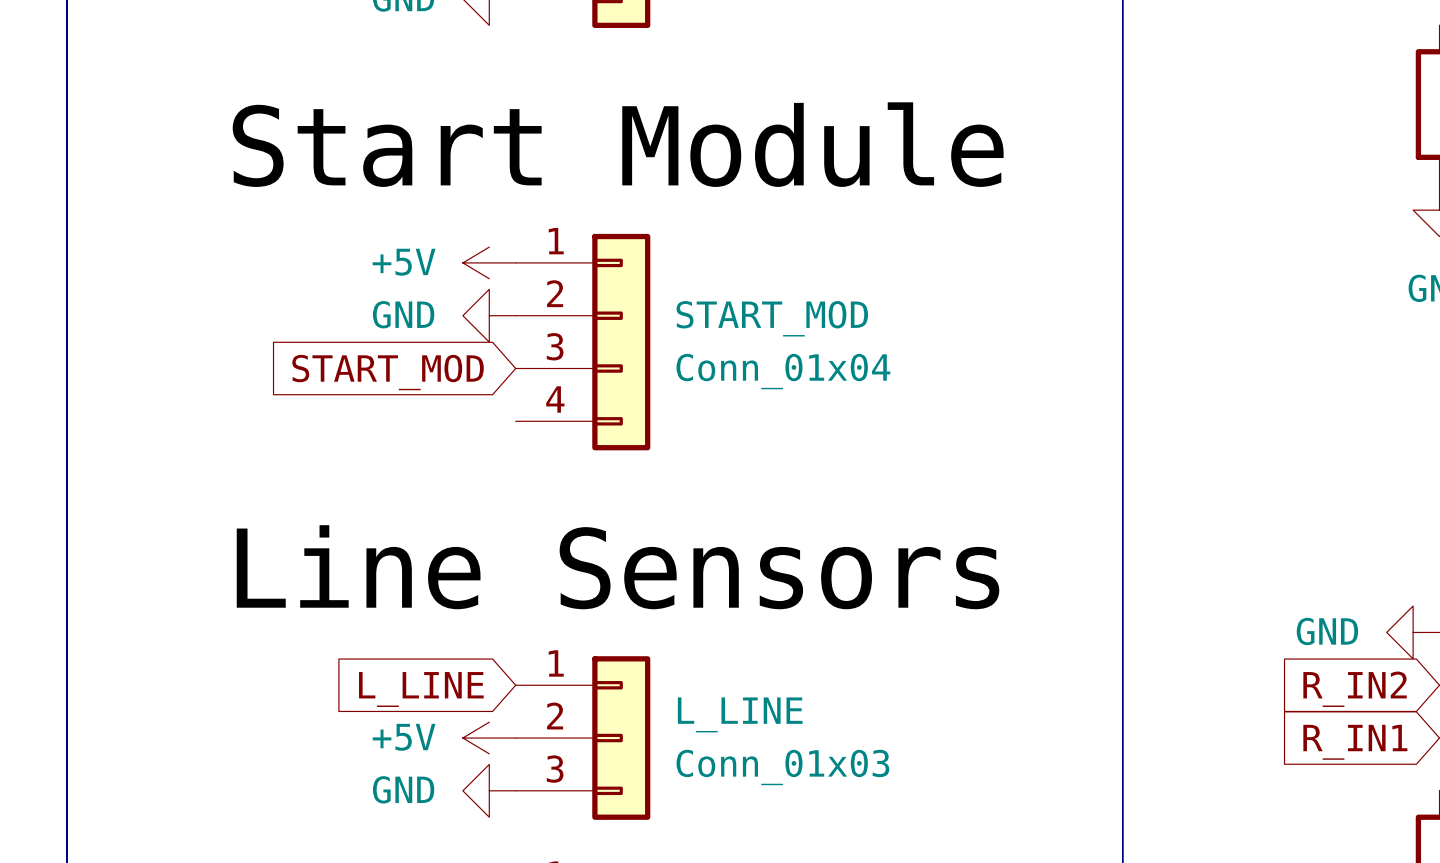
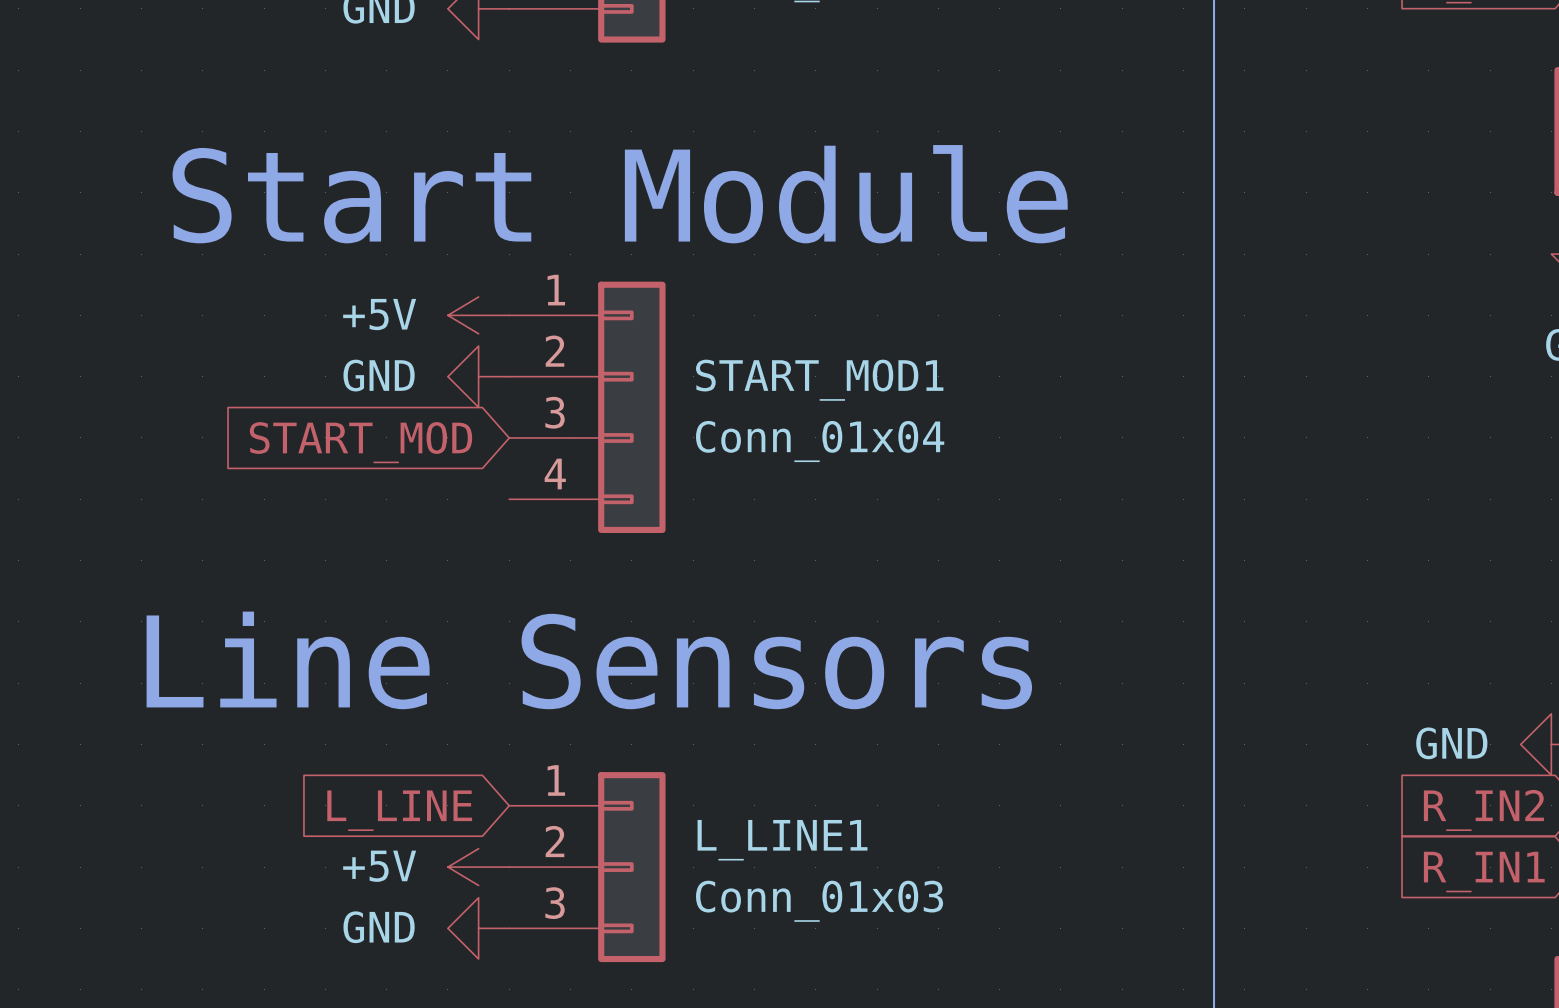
label: Start Module (618, 144) -> none
text: none -> Start Module (620, 194)
START_MOD name: START_MOD (772, 318) -> START_MOD1 (819, 380)
text: none -> Line Sensors (589, 660)
label: Line Sensors (618, 567) -> none
L_LINE name: L_LINE (740, 714) -> L_LINE1 (782, 840)

